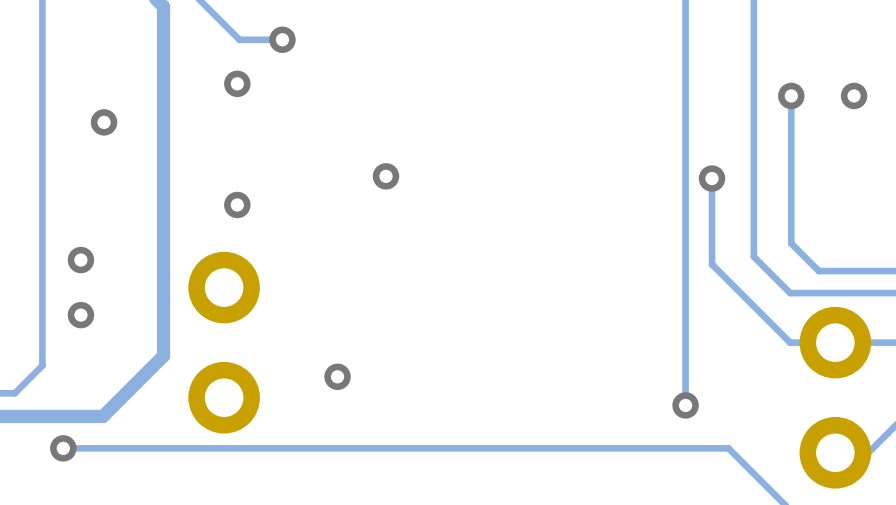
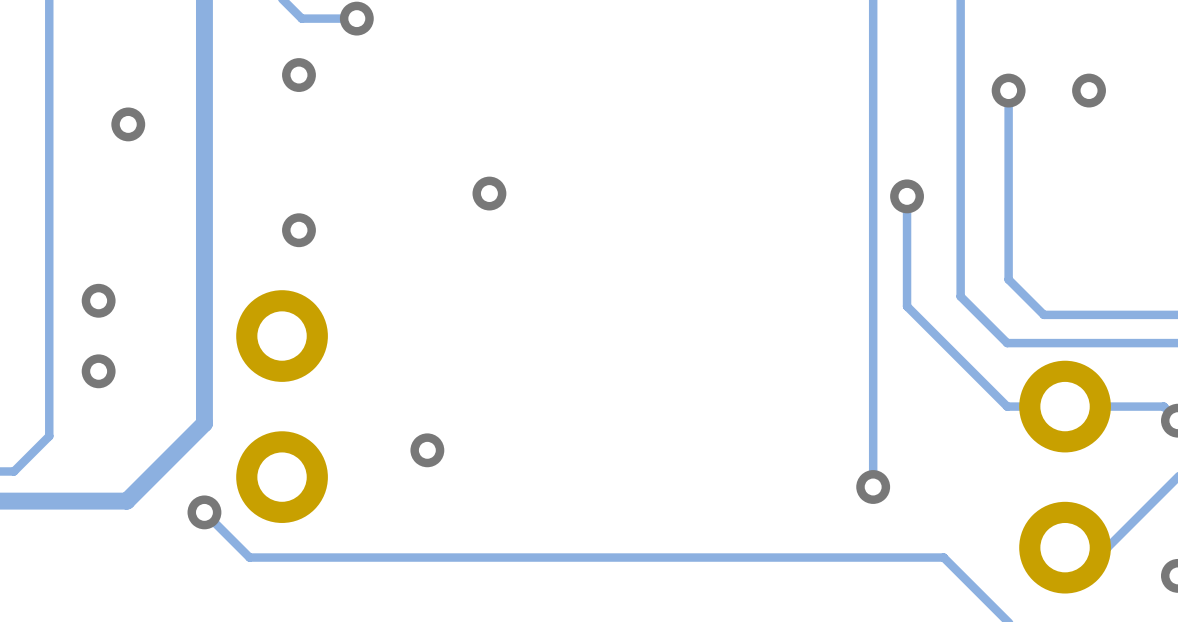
track: (63, 448) (728, 448) (740, 460) -> (204, 512) (249, 557) (943, 557)
via position: (63, 448) -> (204, 512)

